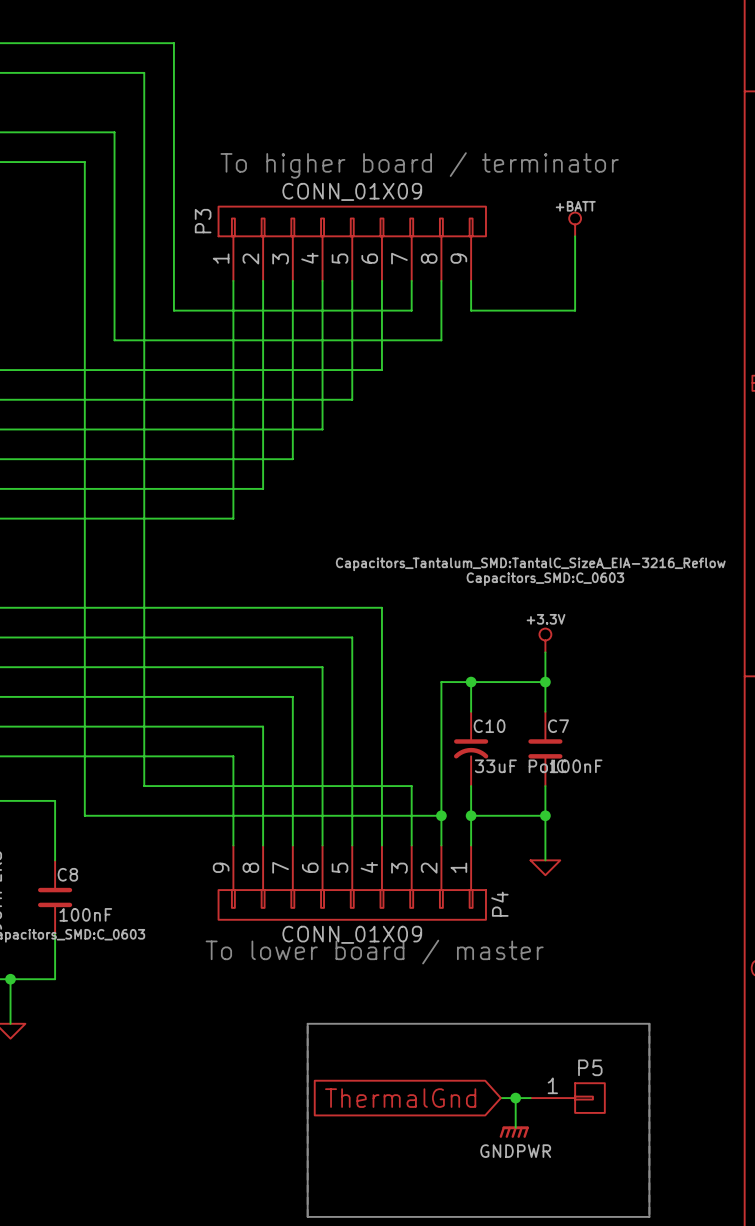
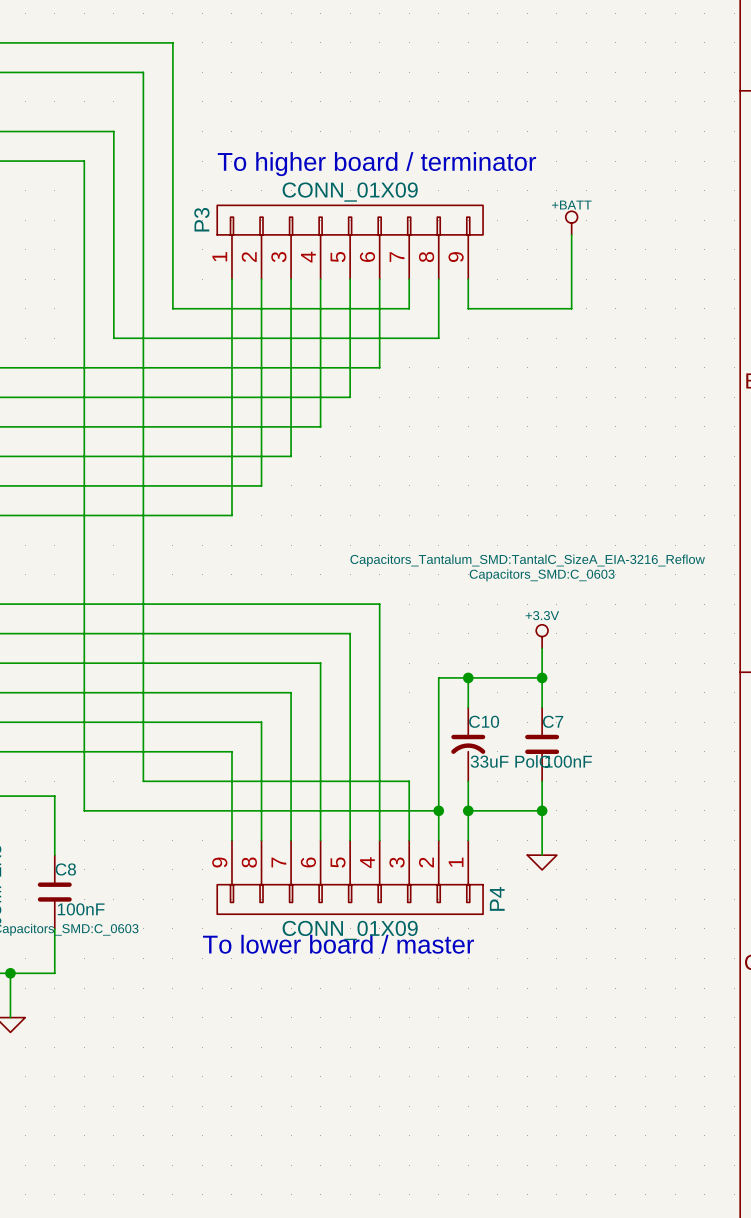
bus: (307, 1023) (649, 1023) (649, 1216) (307, 1216) (307, 1023) -> none
global label: ThermalGnd (400, 1098) -> none
wire: (500, 1098) (530, 1098) -> none
wire: (515, 1098) (515, 1127) -> none
junction: (515, 1098) -> none
P5: (567, 1098) -> none
power symbol: GNDPWR (514, 1132) -> none

